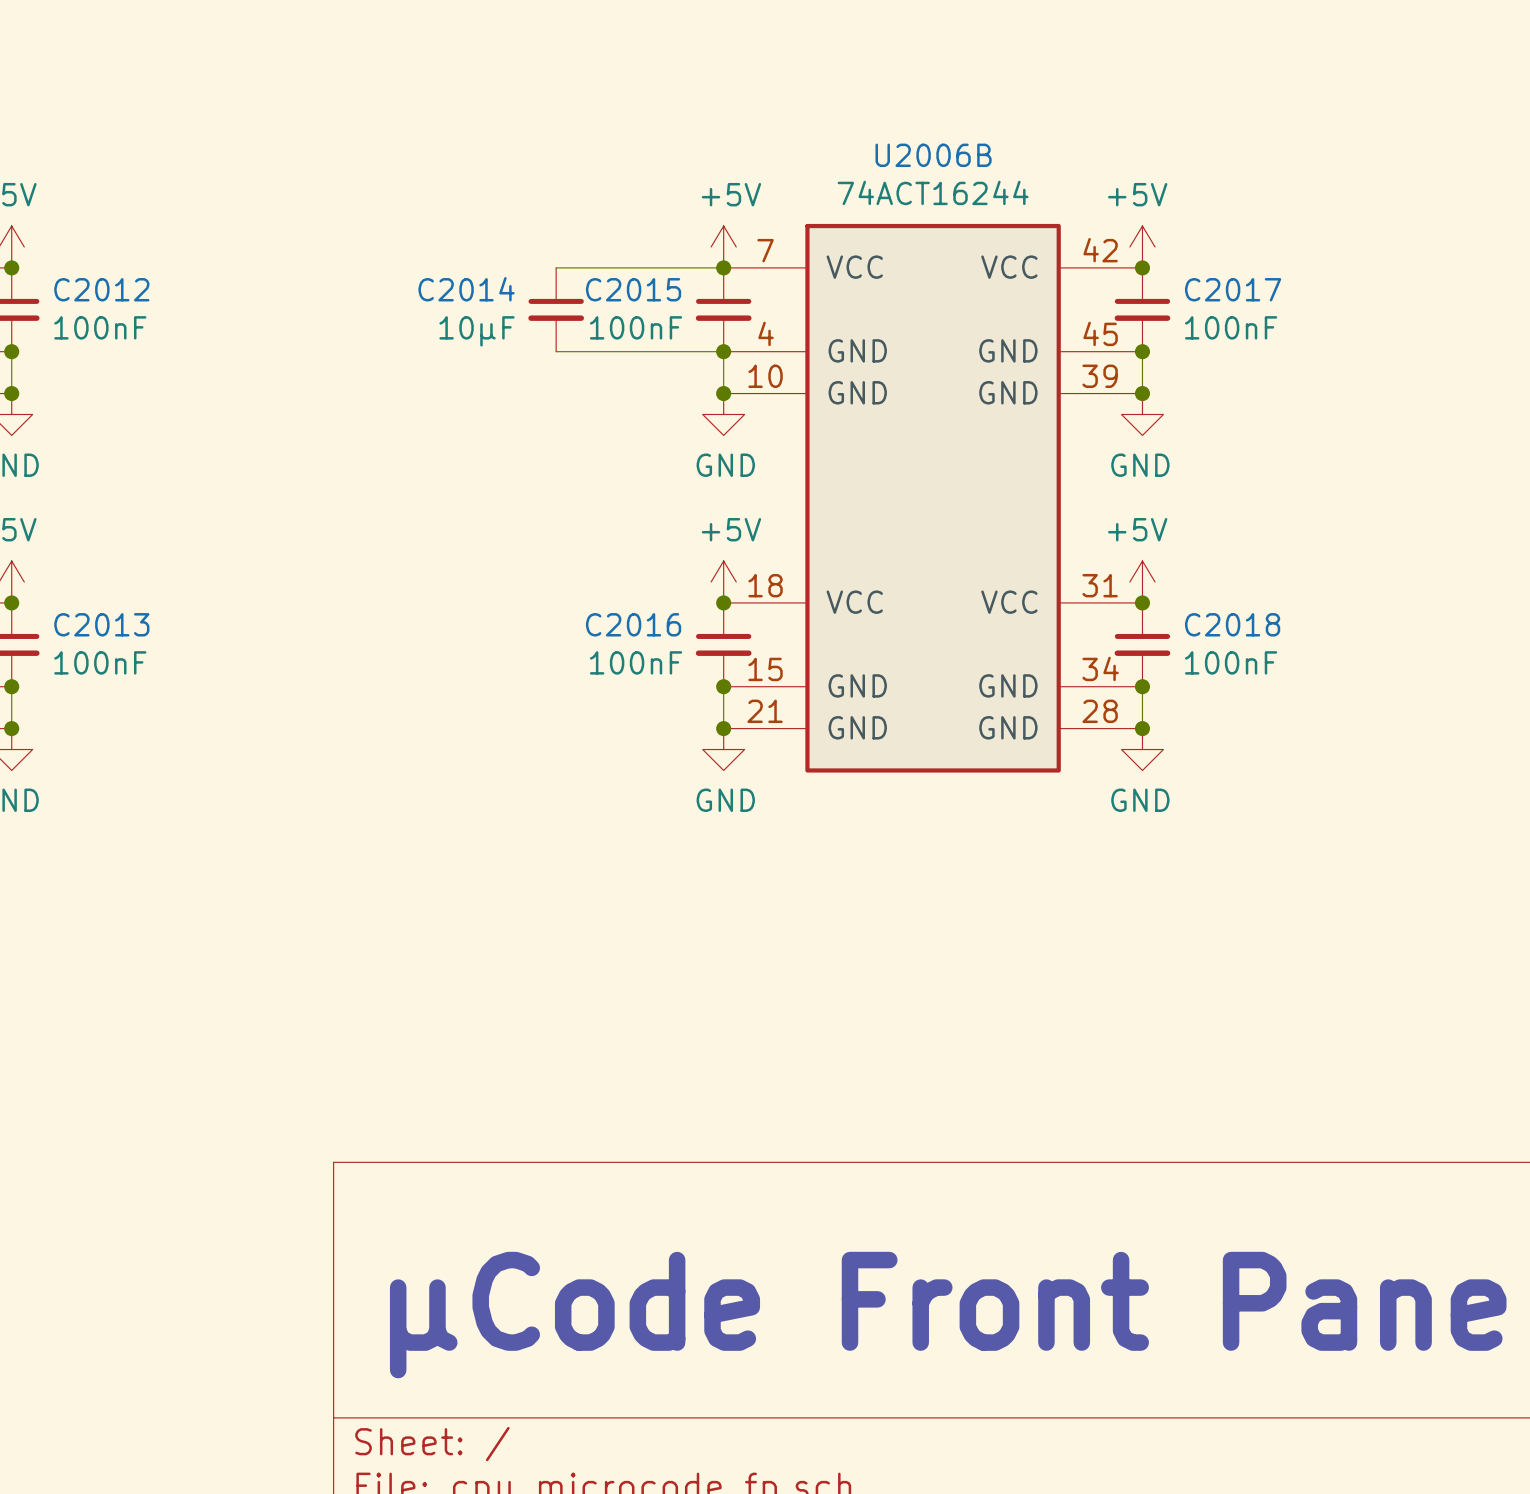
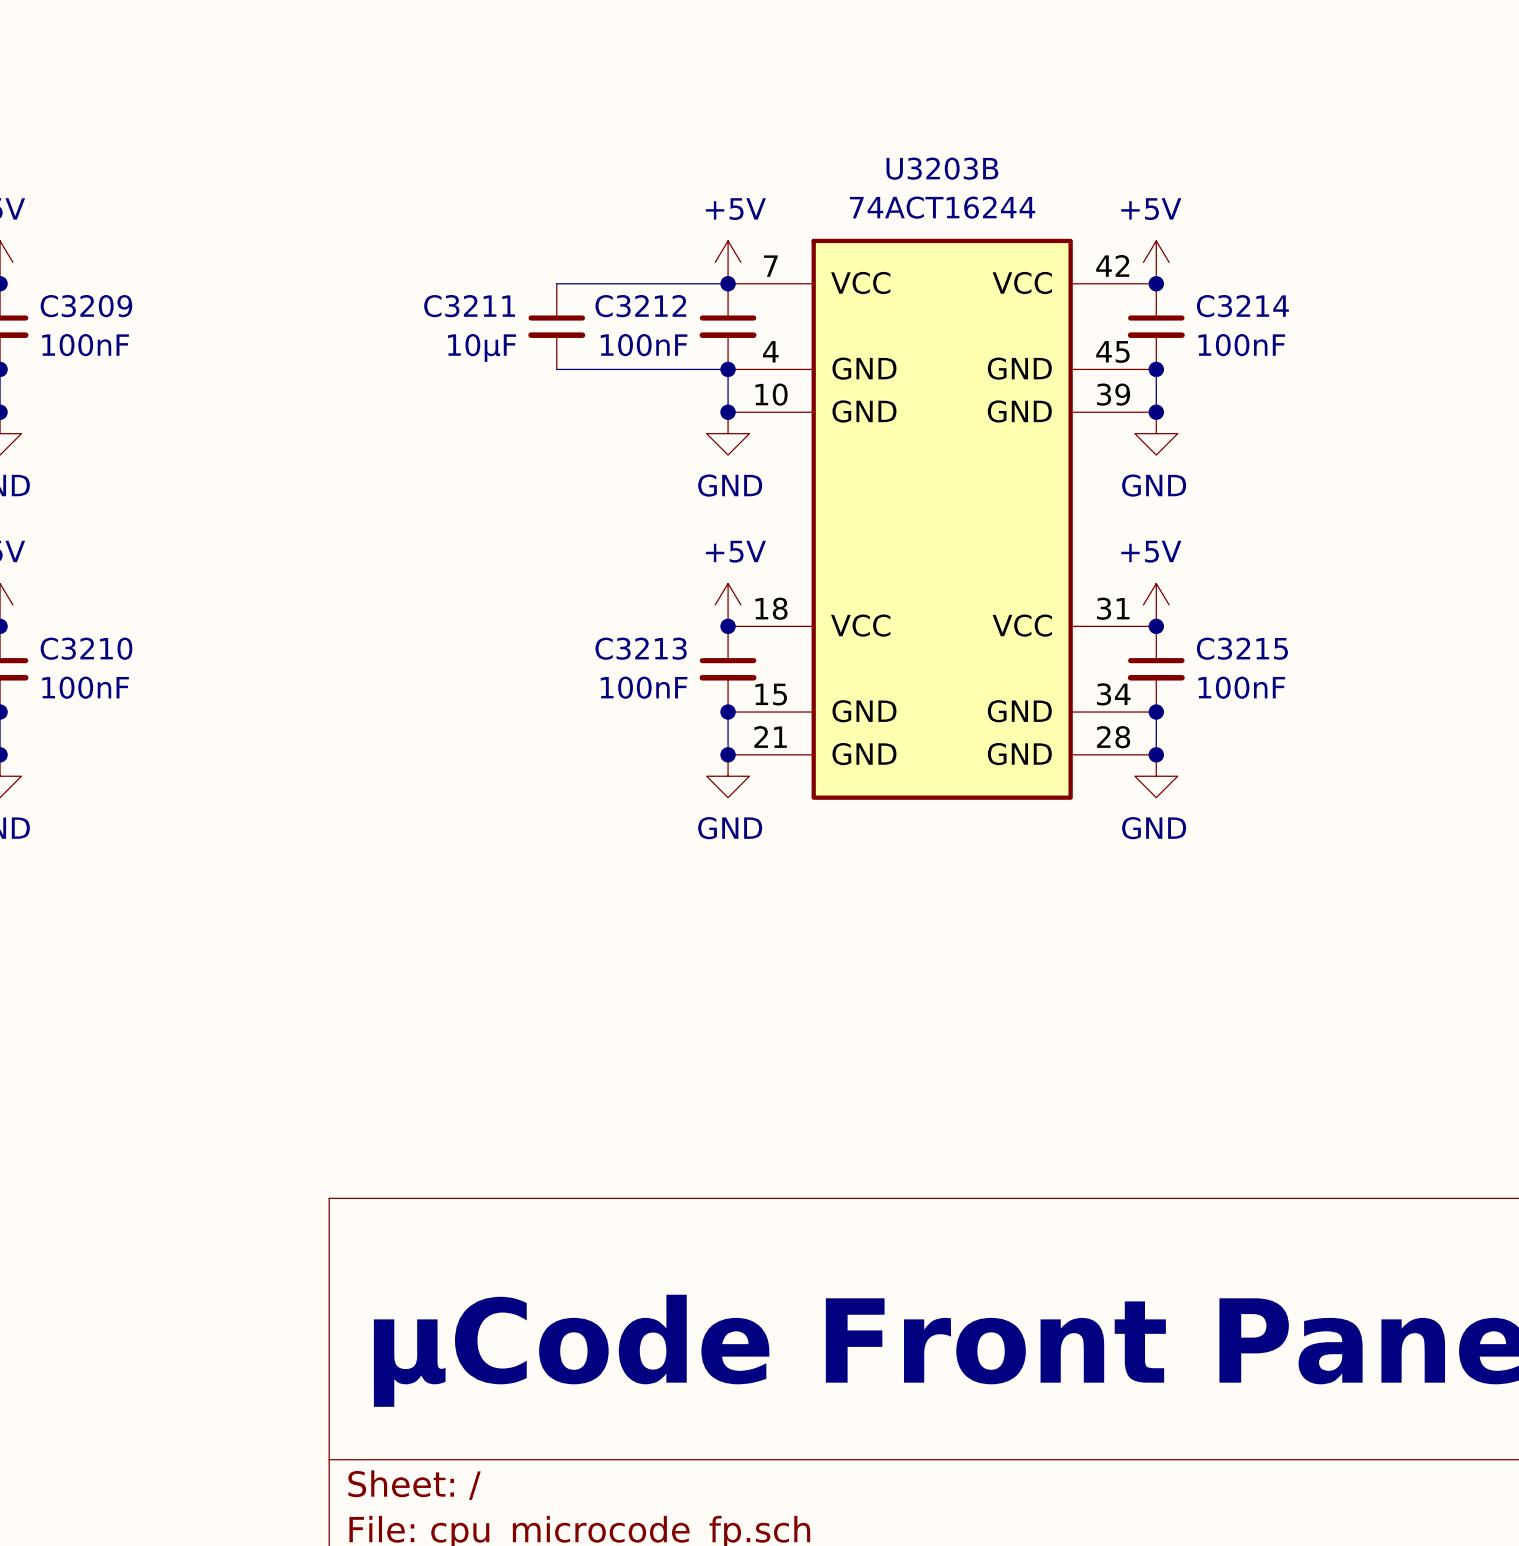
U2006B name: U2006B (933, 155) -> U3203B (942, 168)
C2012 name: C2012 (101, 289) -> C3209 (86, 306)
C2014 name: C2014 (466, 289) -> C3211 (469, 306)
C2015 name: C2015 (633, 289) -> C3212 (640, 306)
C2017 name: C2017 (1233, 289) -> C3214 (1242, 306)
C2013 name: C2013 (101, 624) -> C3210 (86, 648)
C2016 name: C2016 (633, 624) -> C3213 (641, 648)
C2018 name: C2018 (1232, 624) -> C3215 (1242, 648)

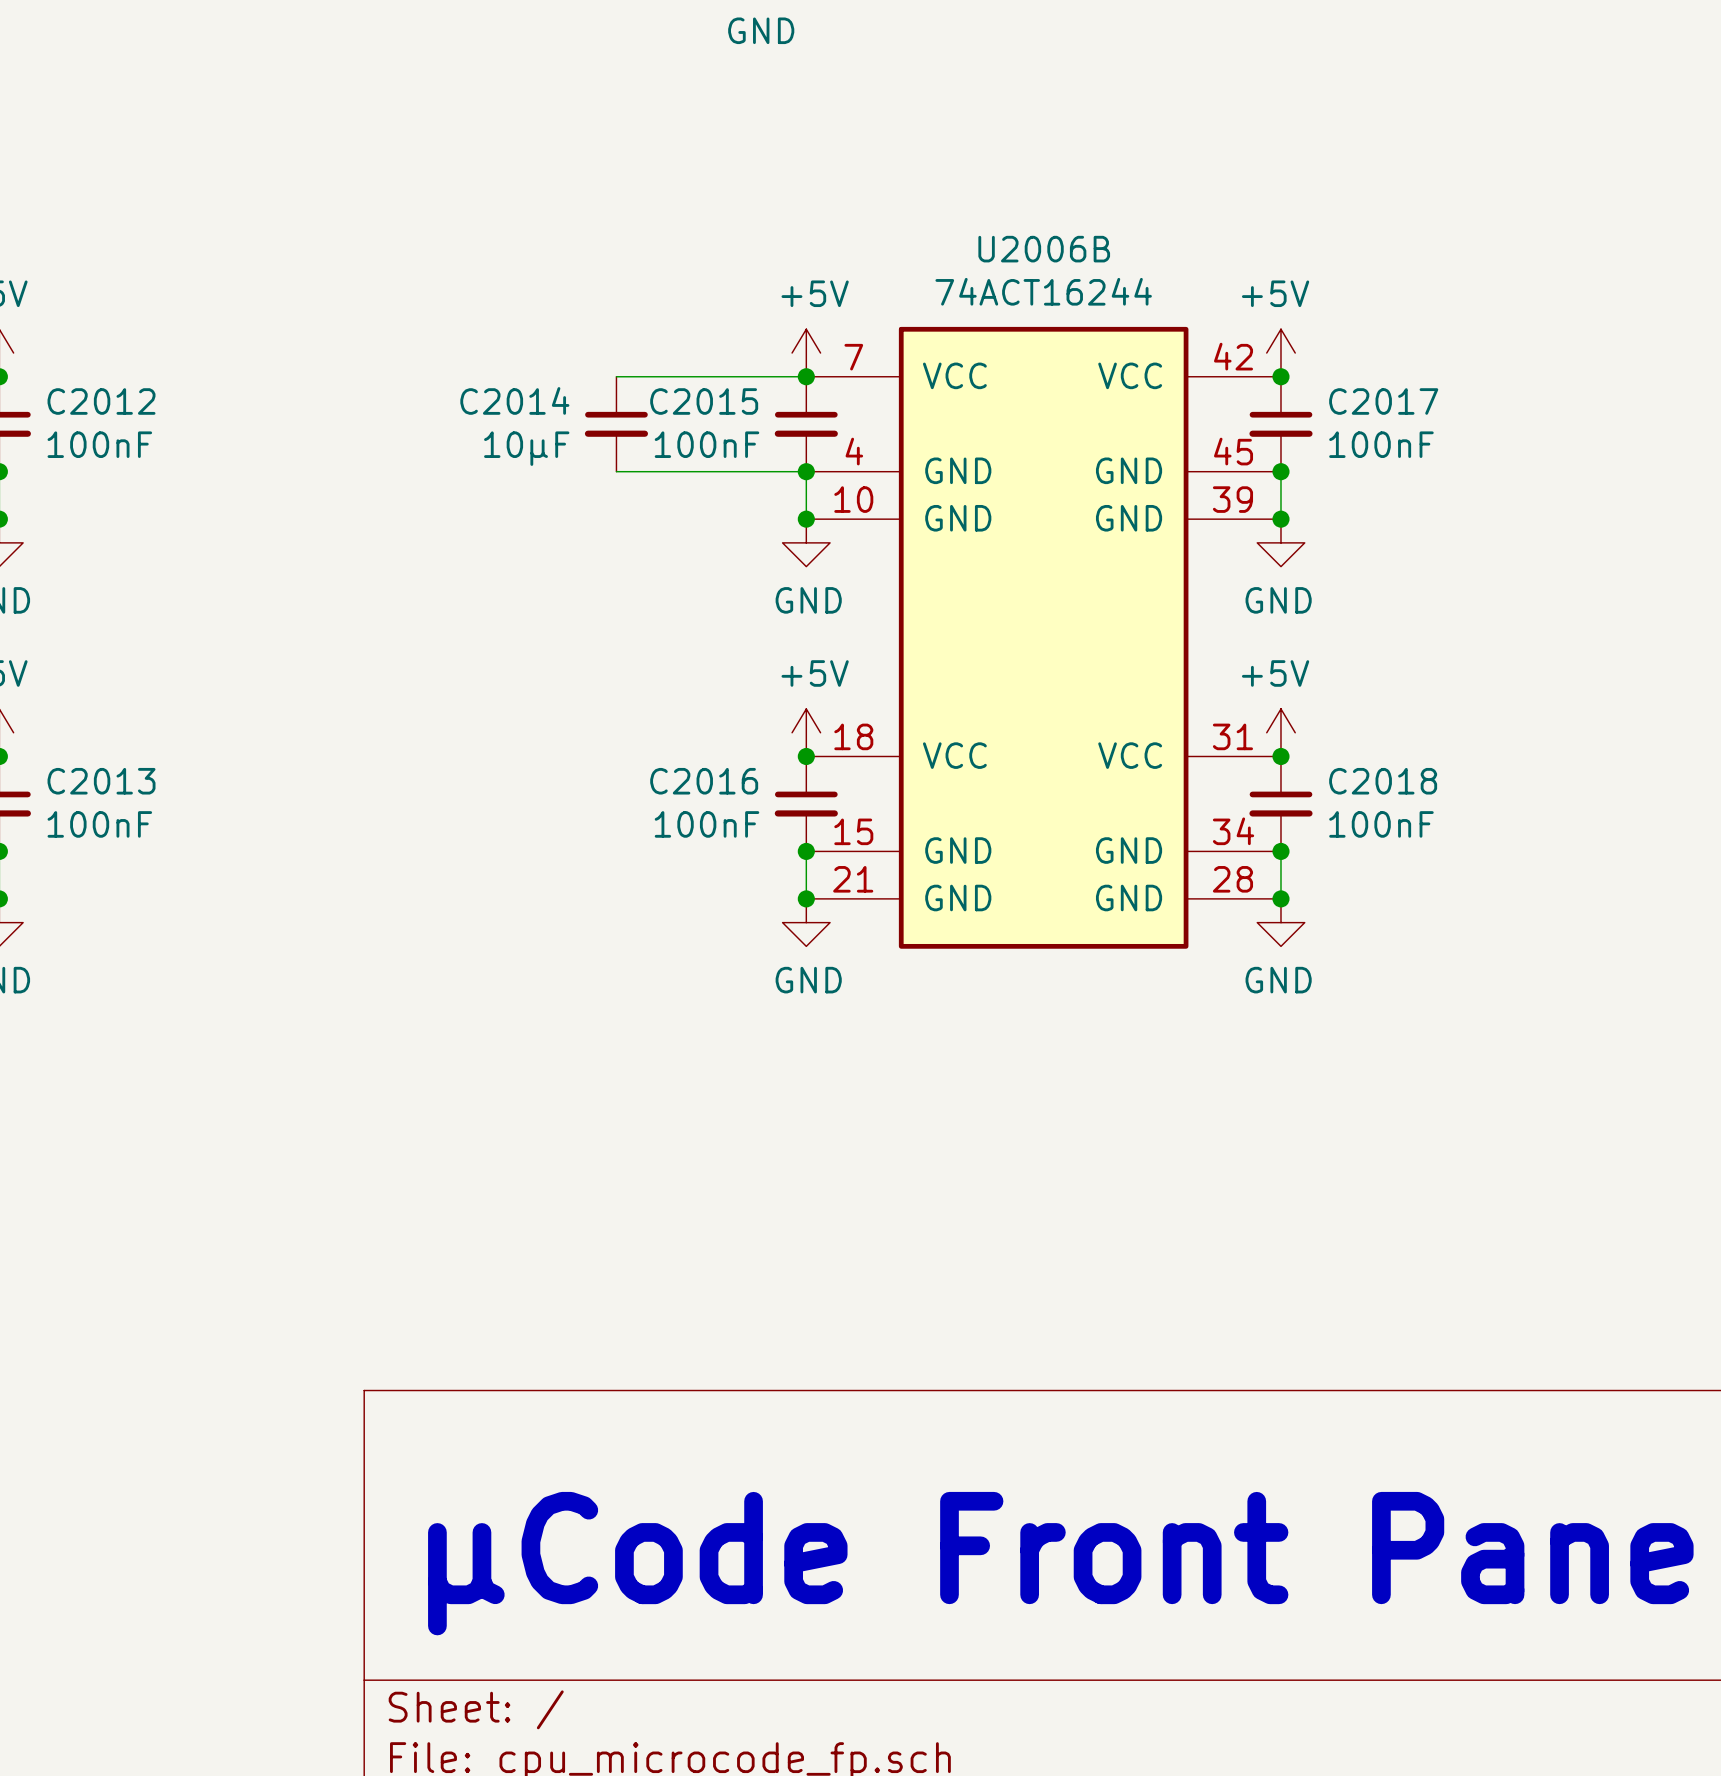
U3203B name: U3203B (942, 168) -> U2006B (1044, 249)
C3209 name: C3209 (86, 306) -> C2012 (101, 401)
C3211 name: C3211 (469, 306) -> C2014 (514, 400)
C3212 name: C3212 (640, 306) -> C2015 (704, 401)
C3214 name: C3214 (1242, 306) -> C2017 (1383, 401)
C3210 name: C3210 (86, 648) -> C2013 (101, 781)
C3213 name: C3213 (641, 648) -> C2016 (704, 781)
C3215 name: C3215 (1242, 648) -> C2018 (1383, 781)

